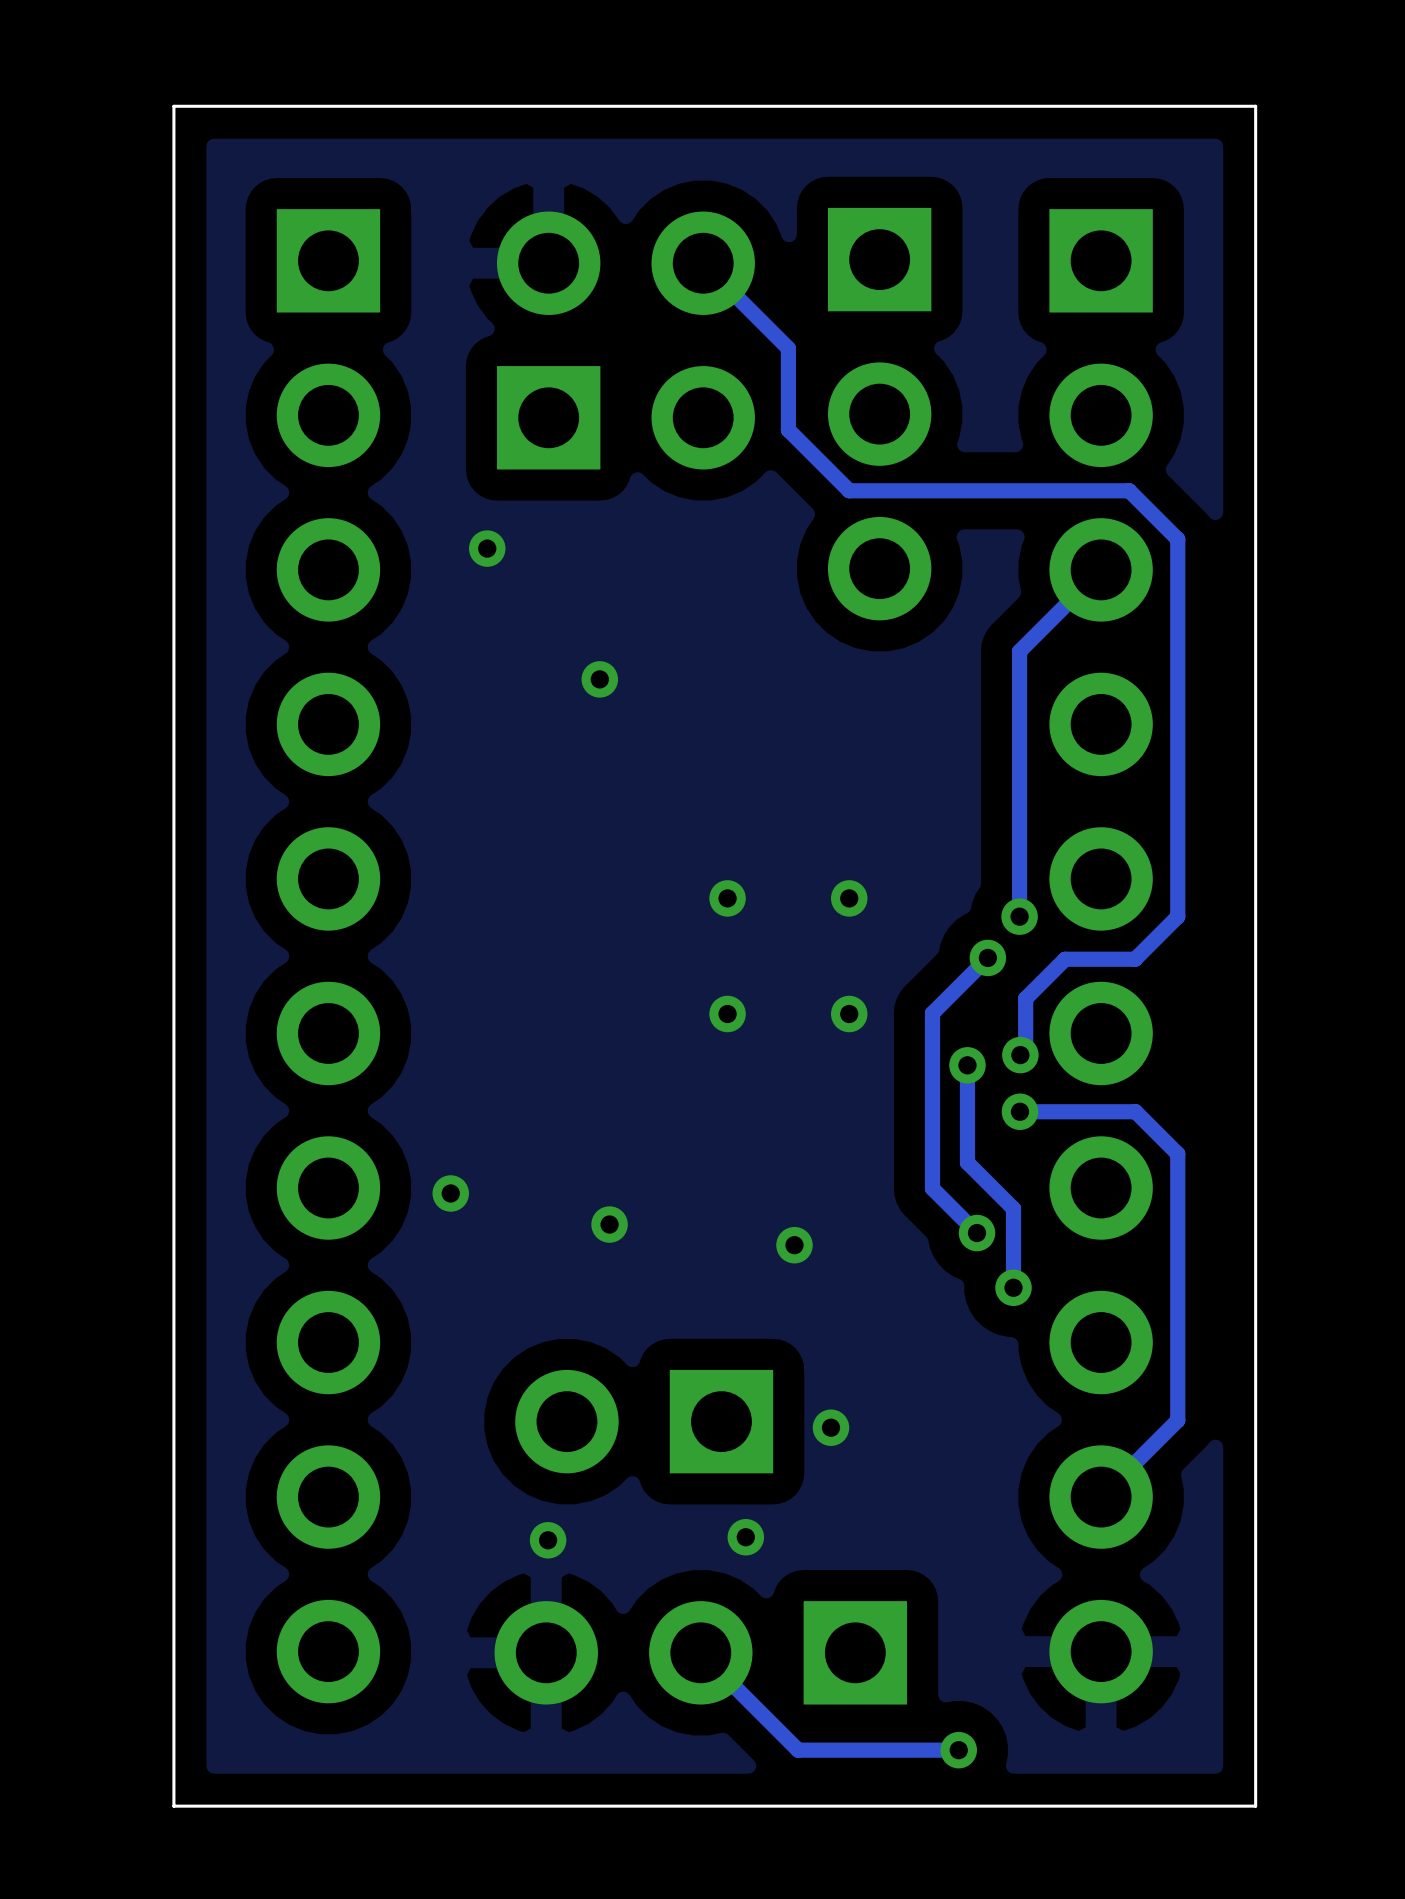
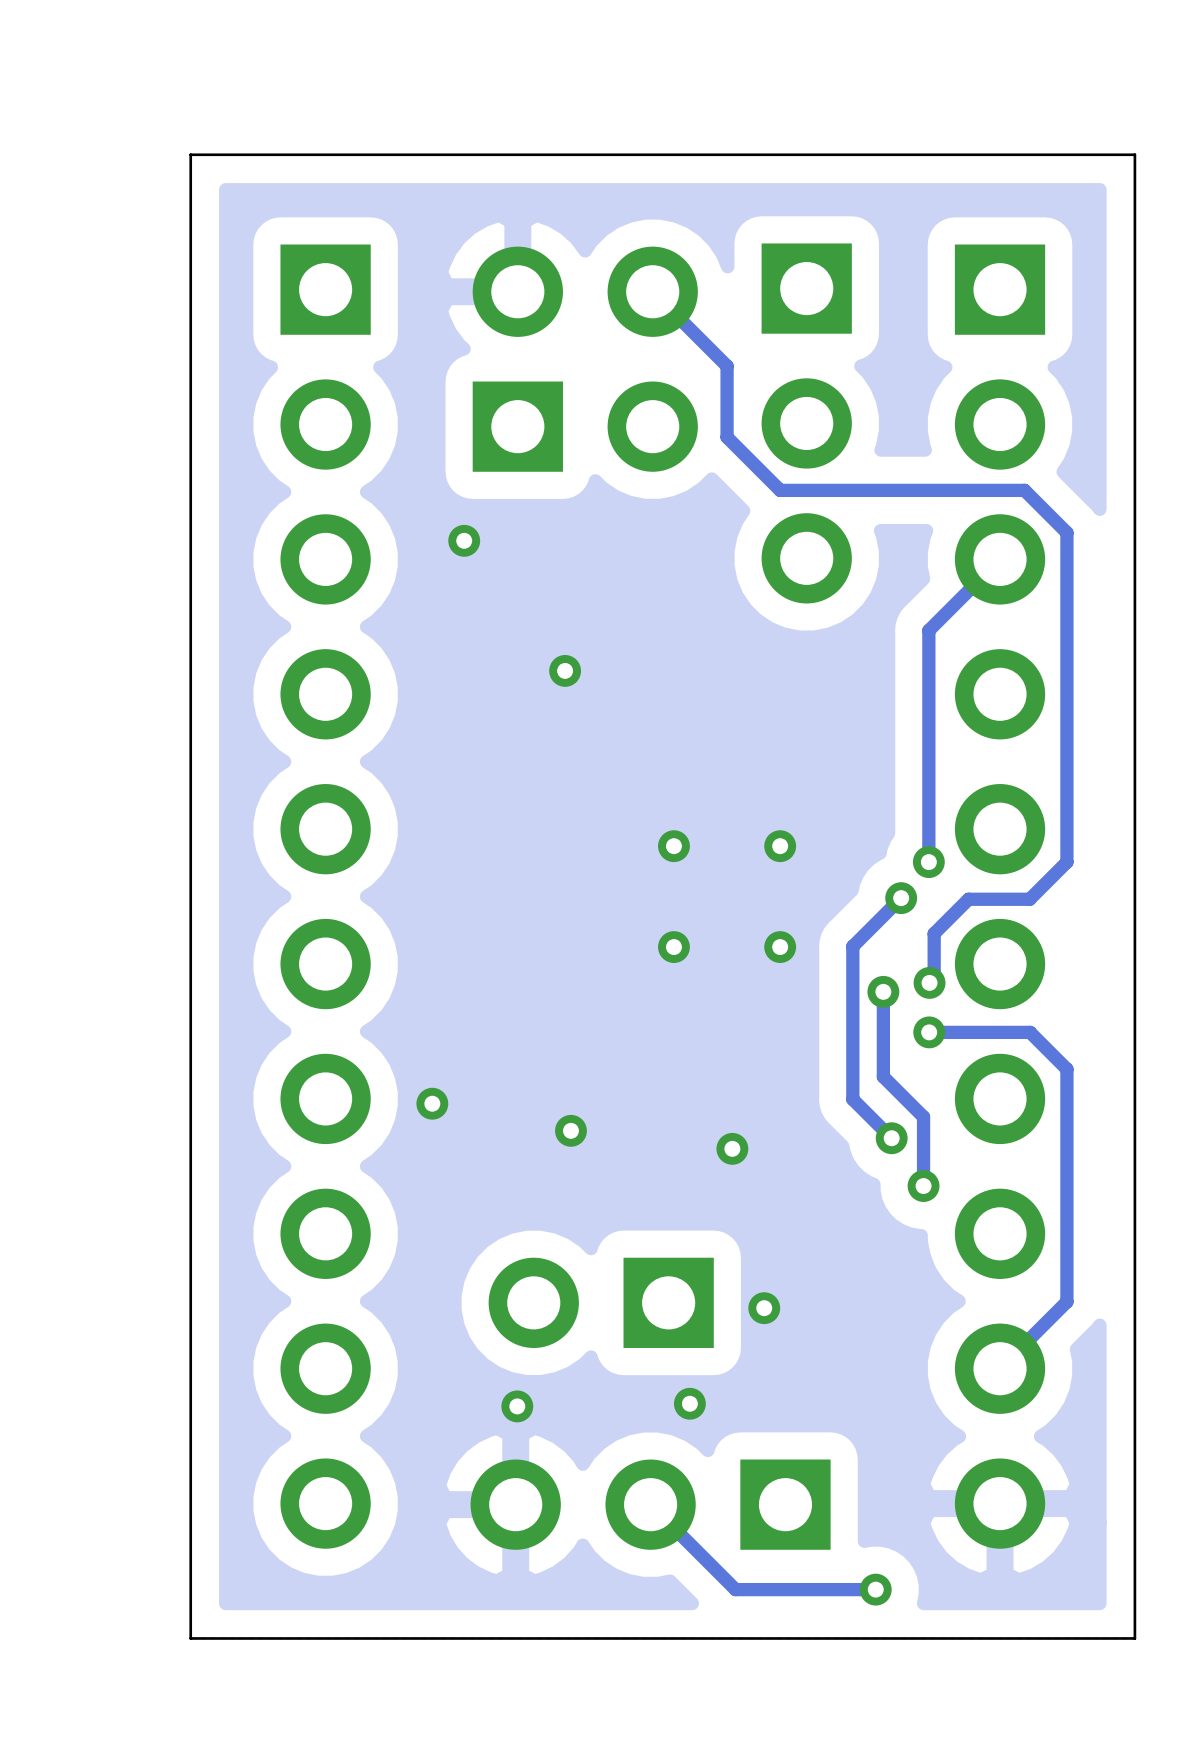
via position: (599, 679) -> (565, 670)

